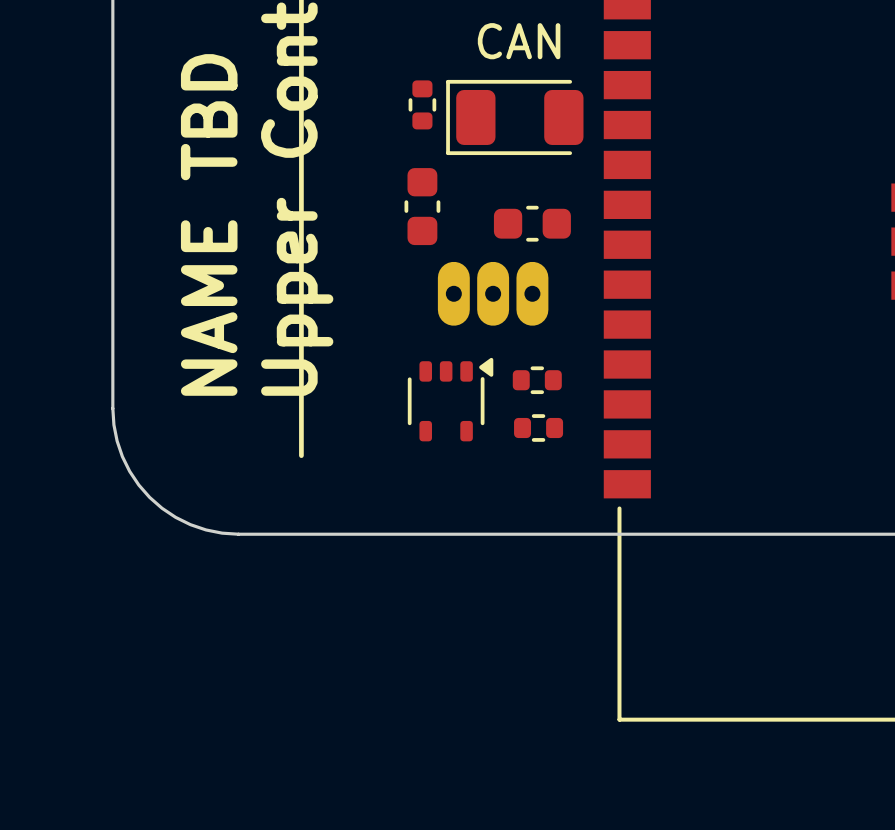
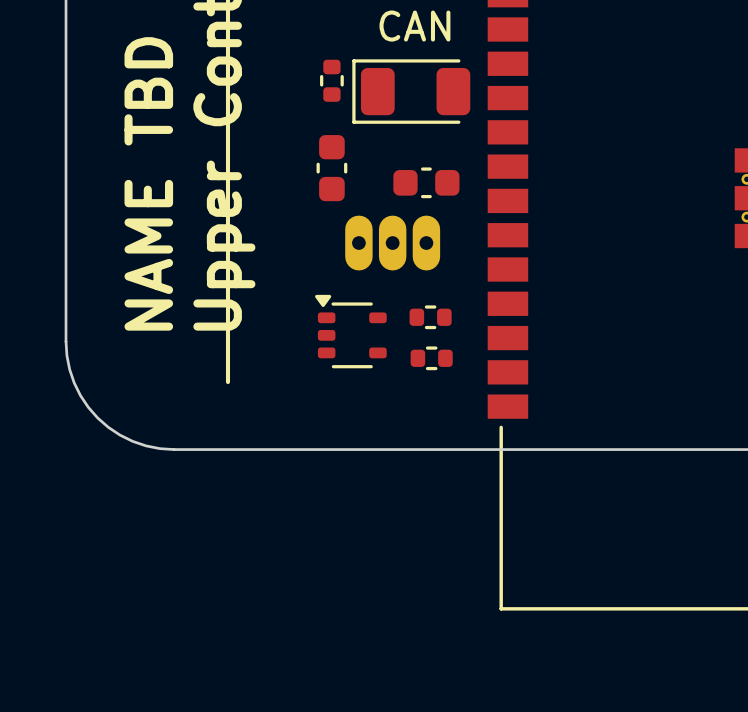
part rotation: 0° (450, 399) -> 90° counterclockwise (350, 331)

